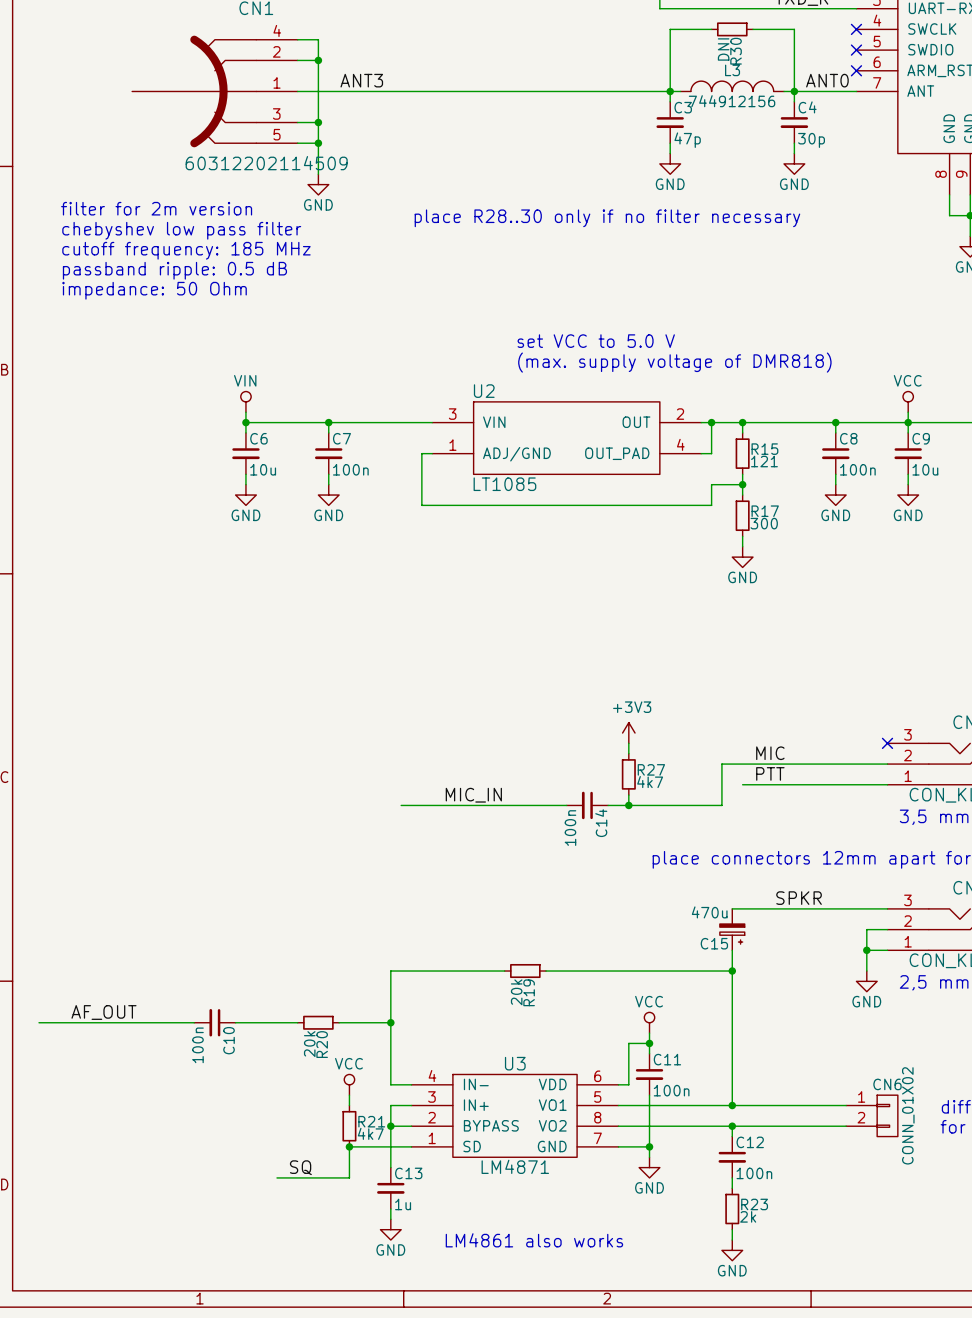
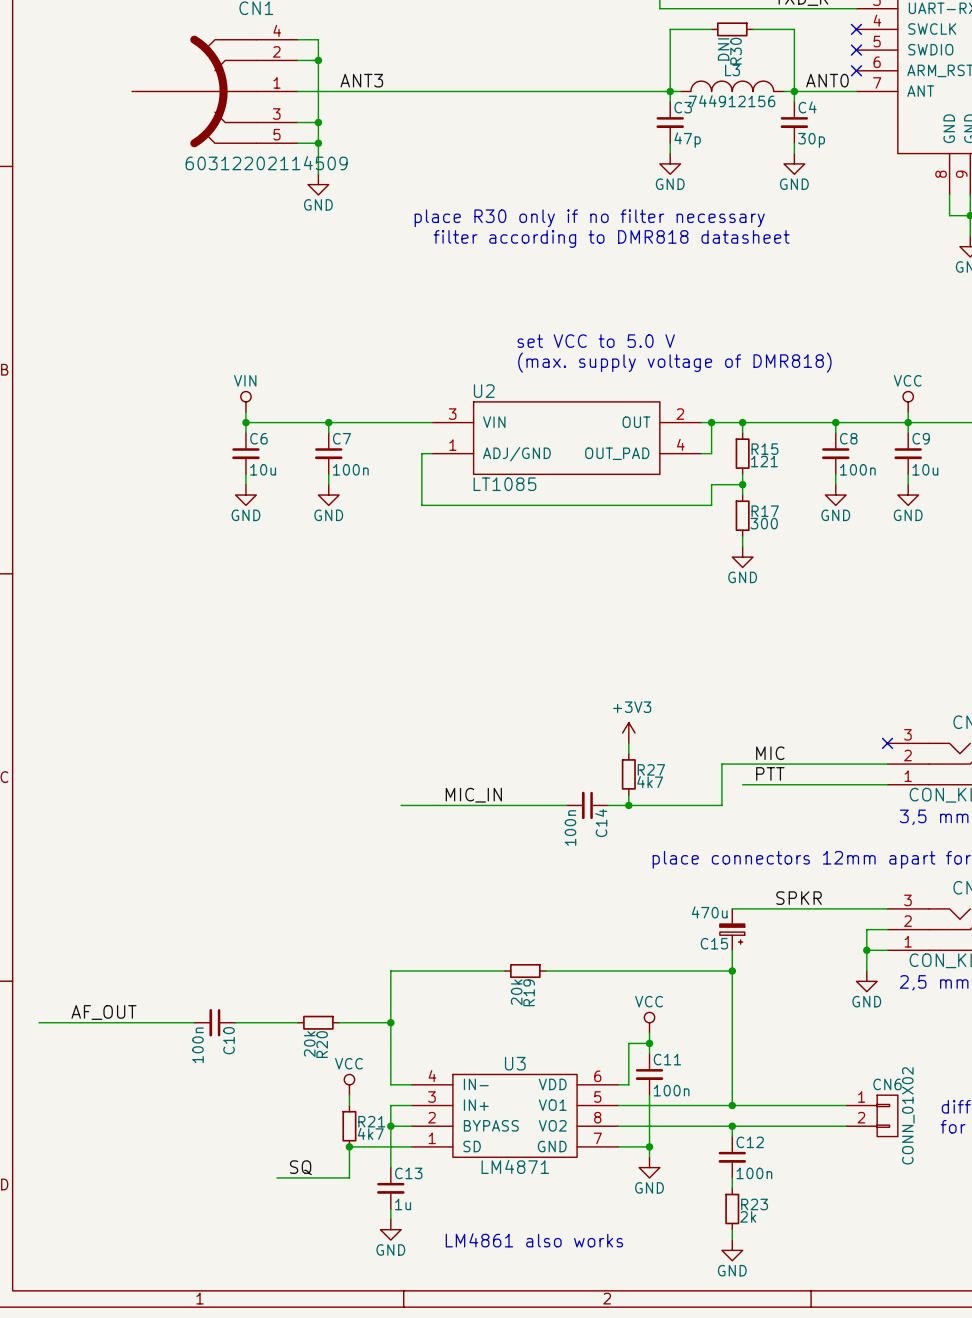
text: filter for 2m version (156, 208) -> none
text: place R28..30 only if no filter necessary (607, 218) -> place R30 only if no filter necessary (589, 218)
text: chebyshev low pass filter (181, 230) -> none
text: none -> filter according to DMR818 datasheet (611, 238)
text: cutoff frequency: 185 MHz (186, 250) -> none
text: passband ripple: 0.5 dB (174, 270) -> none
text: impedance: 50 Ohm (154, 290) -> none

